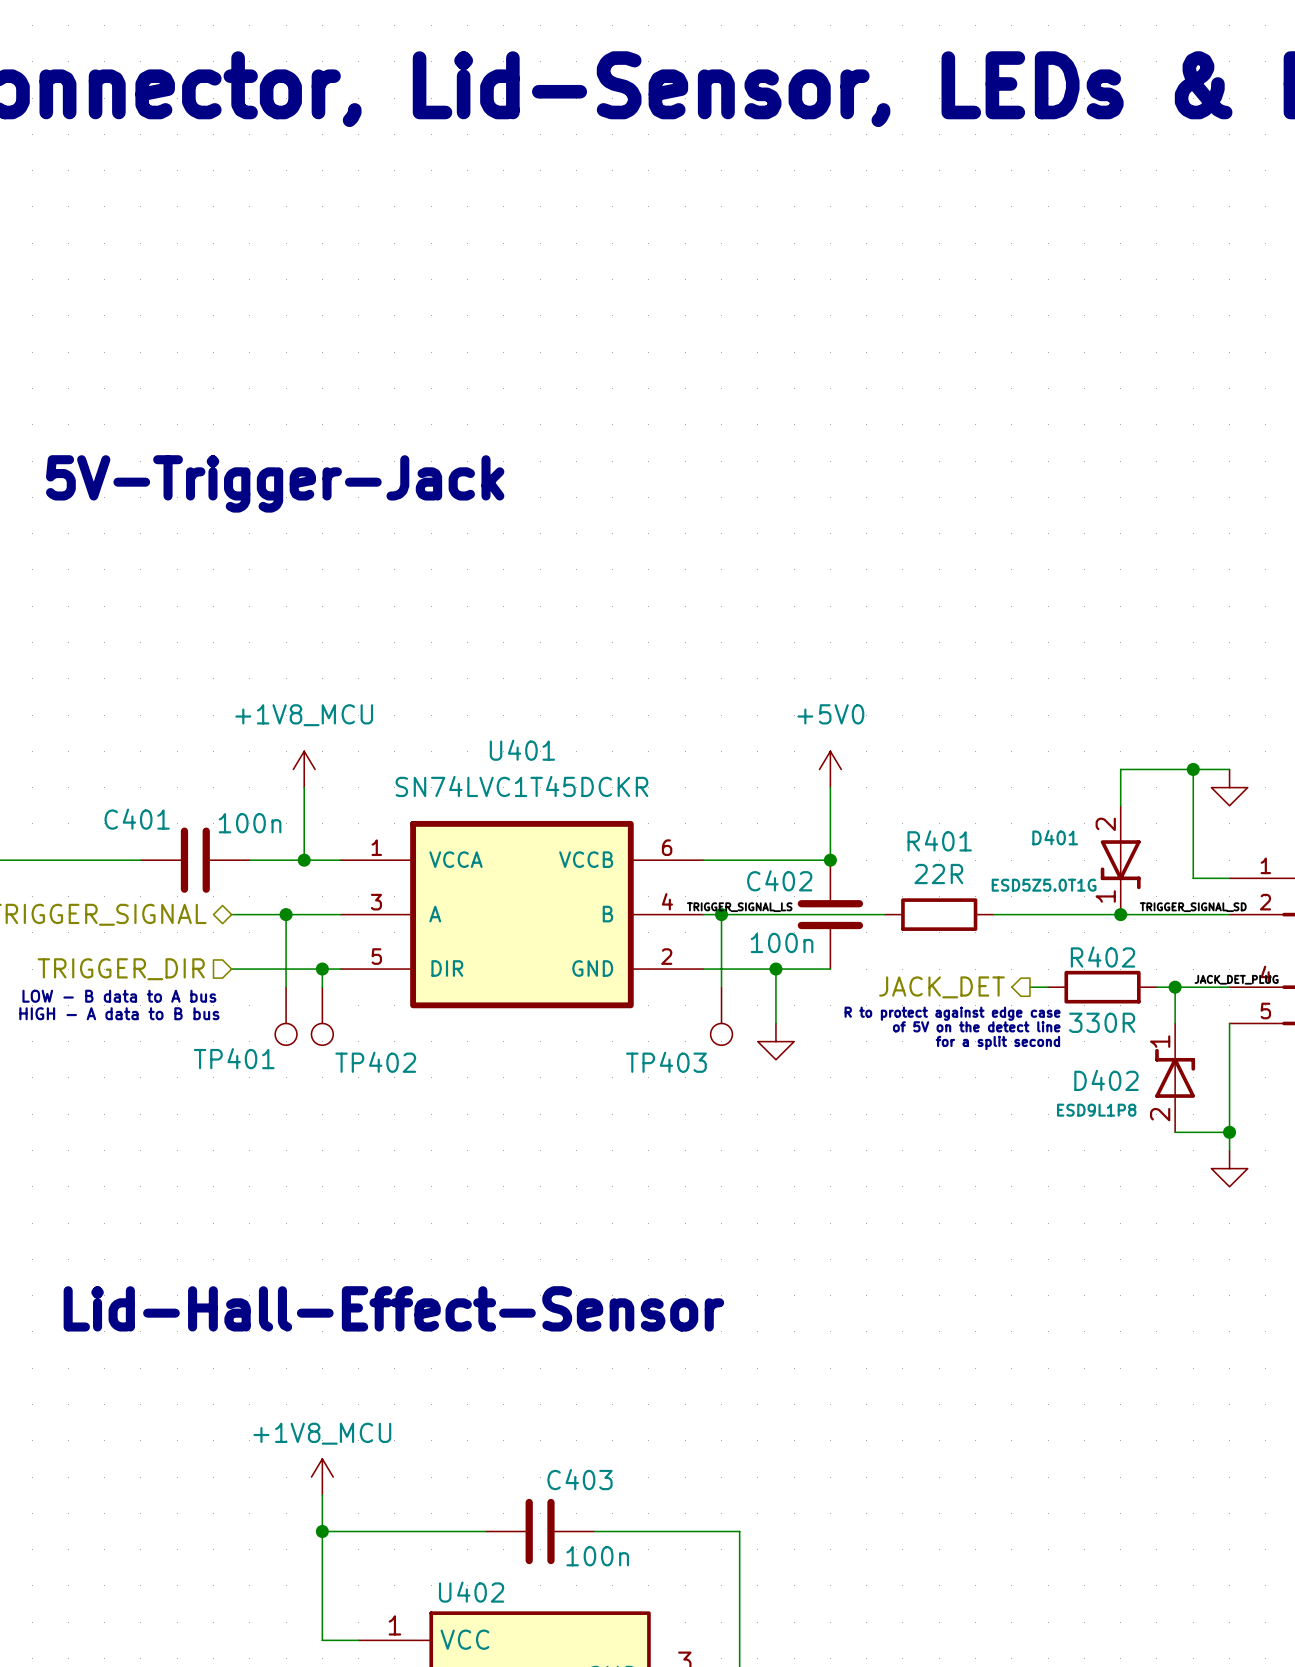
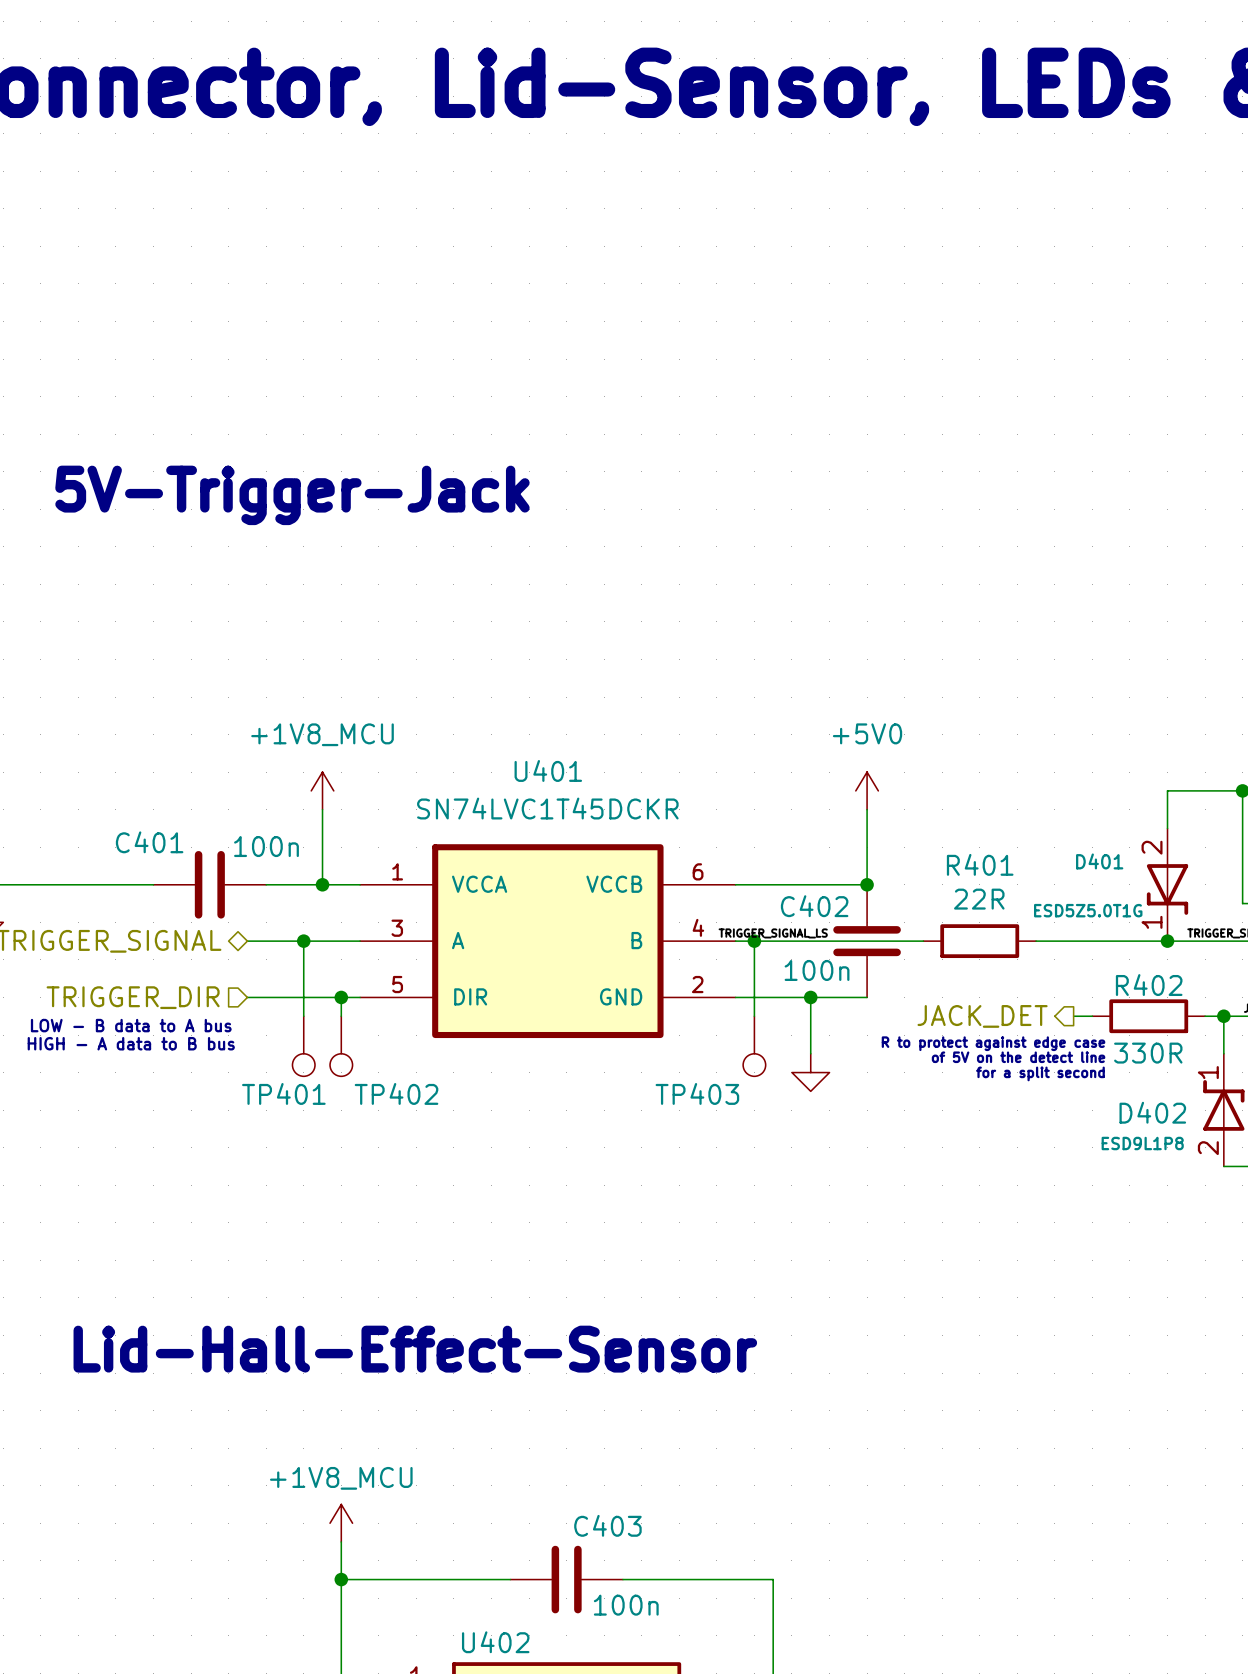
TP401 name position: TP401 (234, 1058) -> TP401 (283, 1093)

